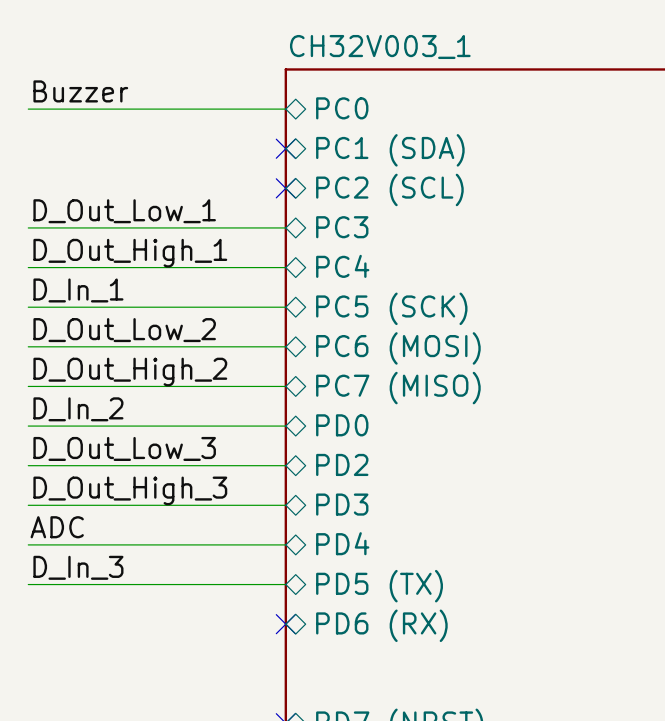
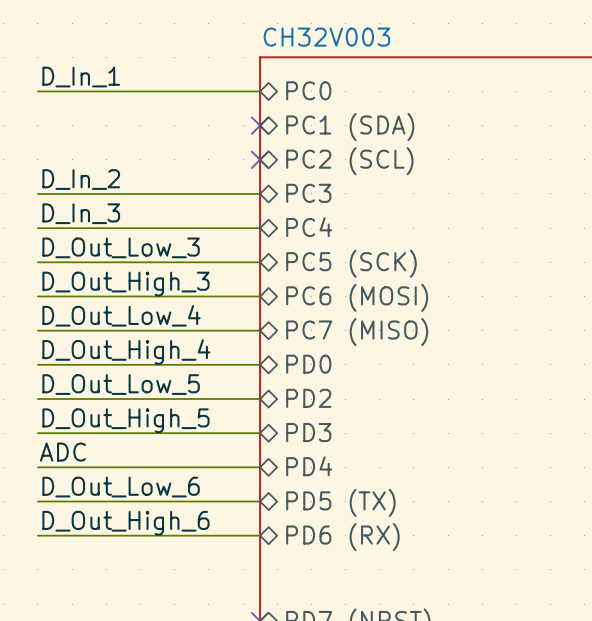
sheet CH32V003_1 name: CH32V003_1 (380, 46) -> CH32V003 (326, 37)
label: Buzzer (80, 91) -> D_In_1 (81, 77)
label: D_Out_Low_1 (124, 211) -> D_In_2 (81, 179)
label: D_Out_High_1 (130, 253) -> D_In_3 (81, 213)
label: D_In_1 (78, 290) -> D_Out_Low_3 (121, 247)
label: D_Out_Low_2 (124, 330) -> D_Out_High_3 (125, 284)
label: D_Out_High_2 (130, 372) -> D_Out_Low_4 (121, 315)
label: D_In_2 (78, 409) -> D_Out_High_4 (126, 352)
label: D_Out_Low_3 (124, 448) -> D_Out_Low_5 (121, 384)
label: D_Out_High_3 (130, 490) -> D_Out_High_5 (125, 420)
label: D_In_3 (78, 567) -> D_Out_Low_6 (121, 487)
label: none -> D_Out_High_6 (125, 523)
wire: none -> (37, 535) (260, 535)
no-connect mark: (285, 624) -> none

